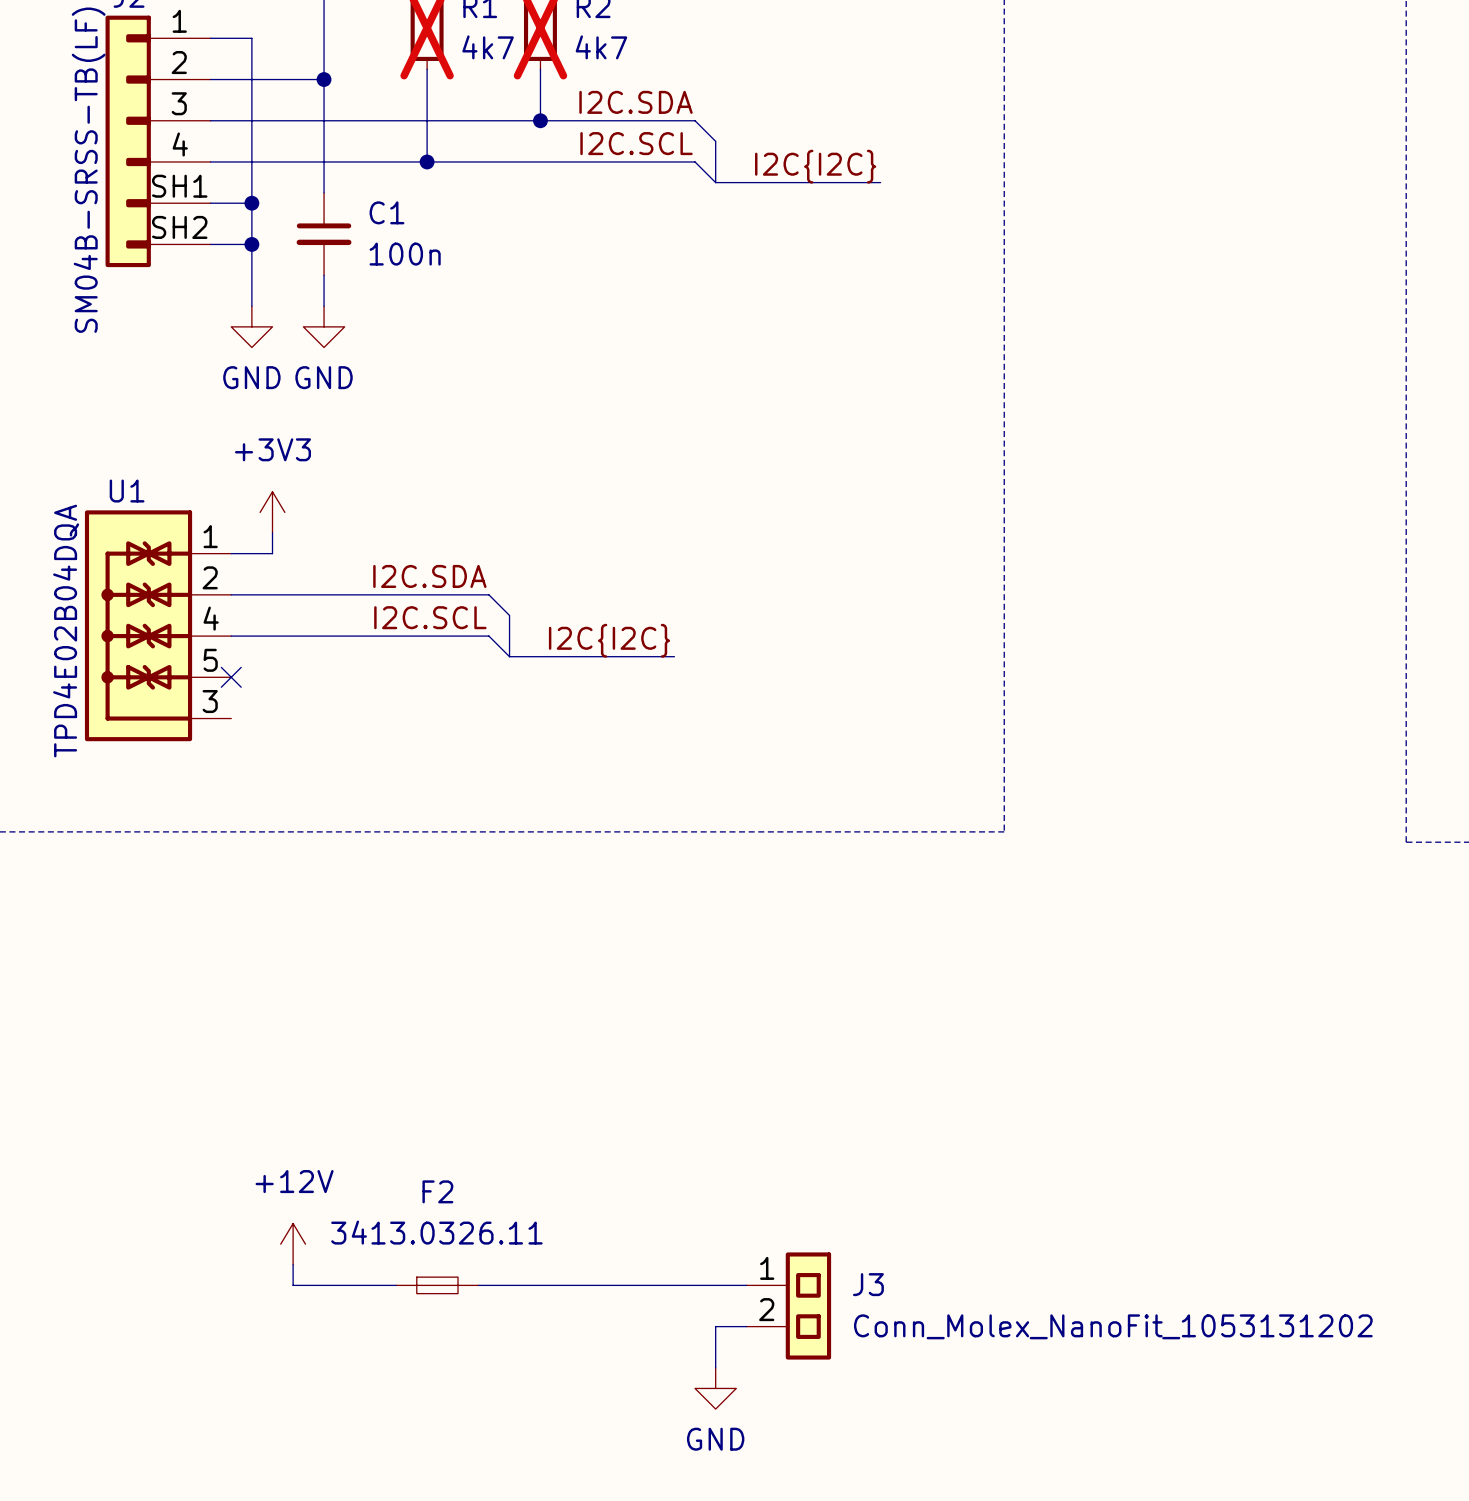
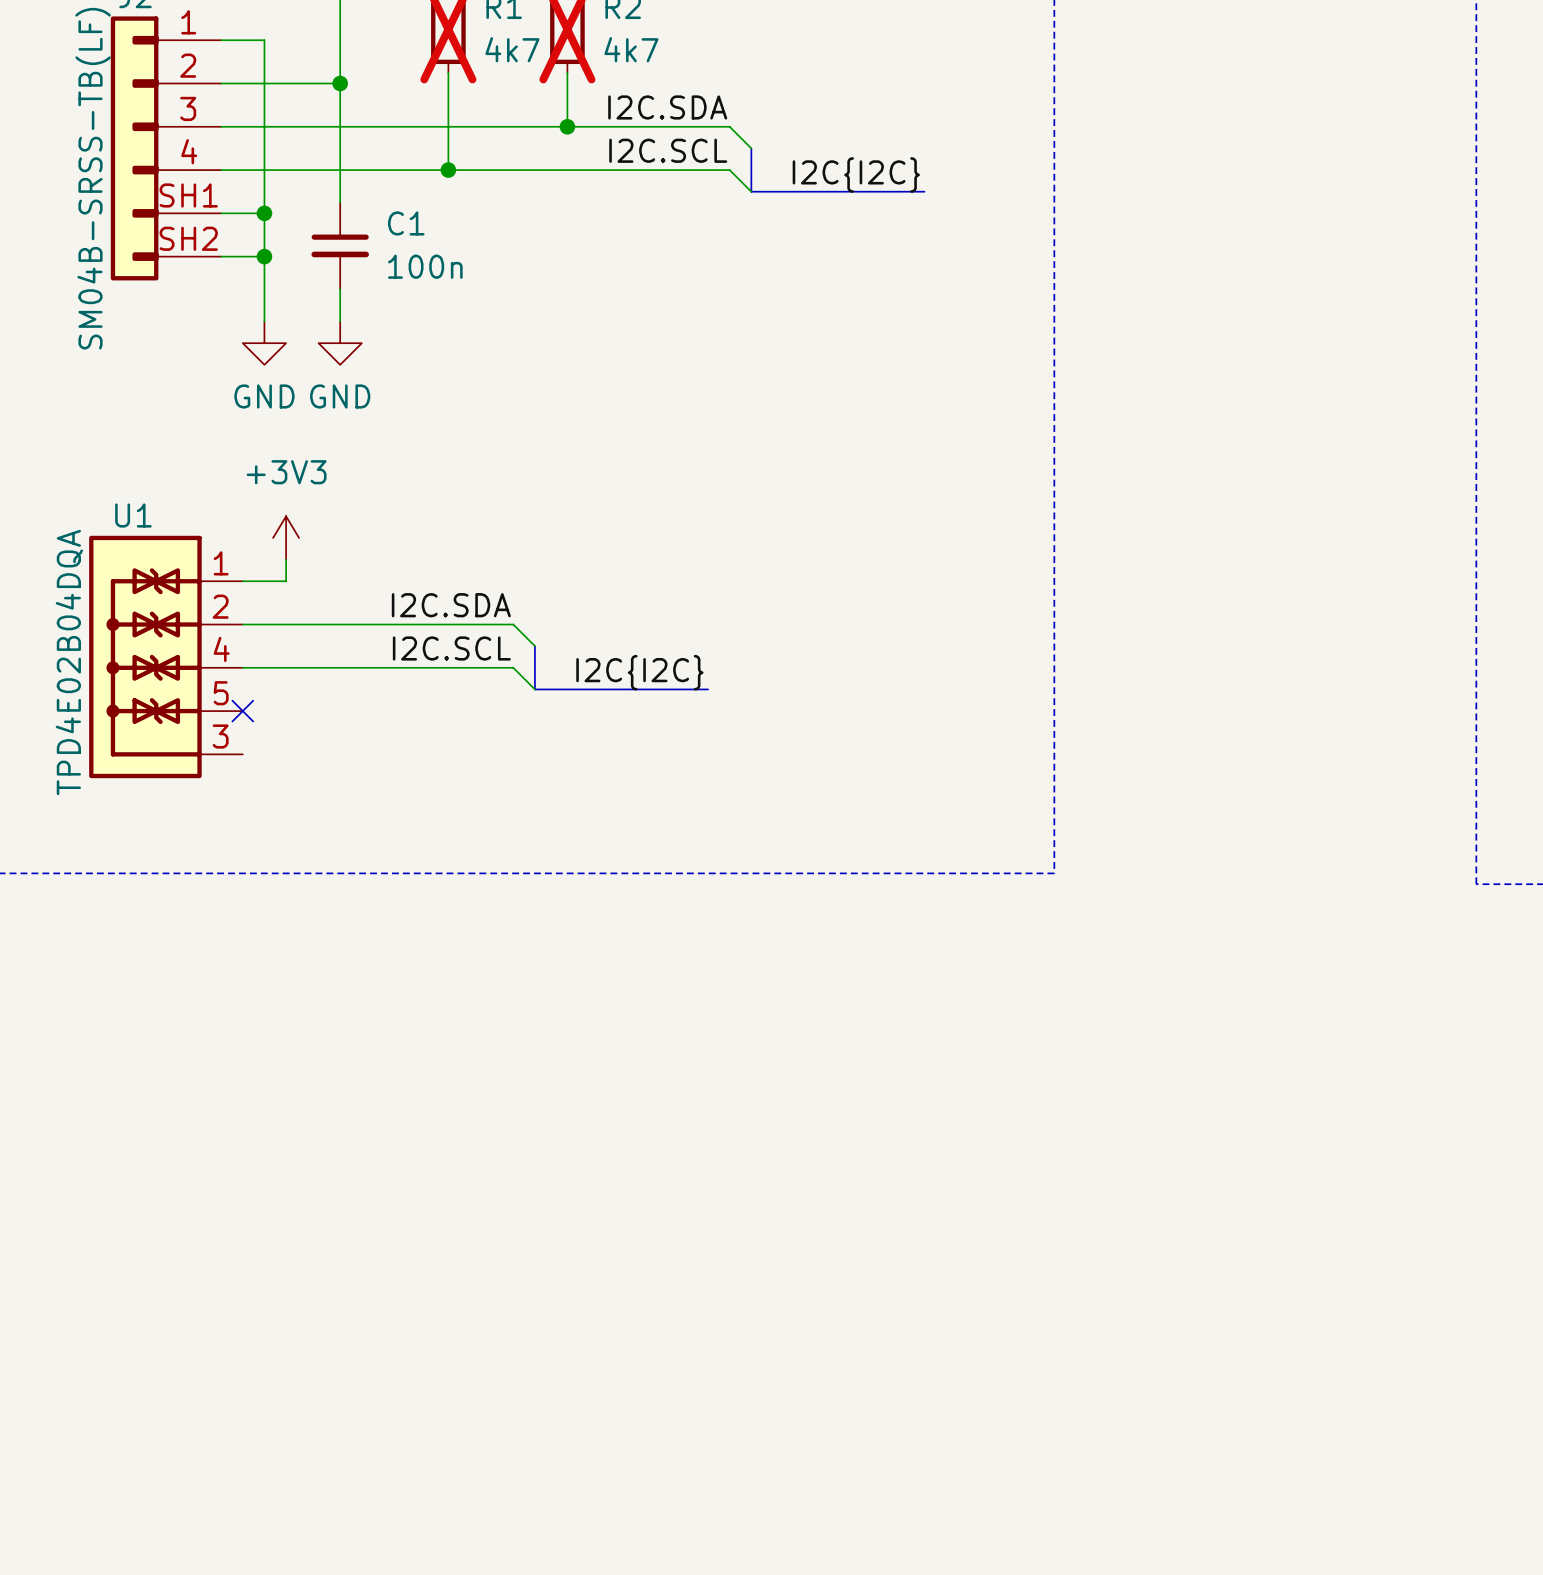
power symbol: +12V (293, 1244) -> none
wire: (293, 1264) (293, 1285) (396, 1285) -> none
F2: (437, 1285) -> none
wire: (478, 1285) (746, 1285) -> none
J3: Conn_Molex_NanoFit_1053131202 (788, 1306) -> none
wire: (746, 1326) (715, 1326) (715, 1367) -> none
power symbol: GND (715, 1388) -> none

